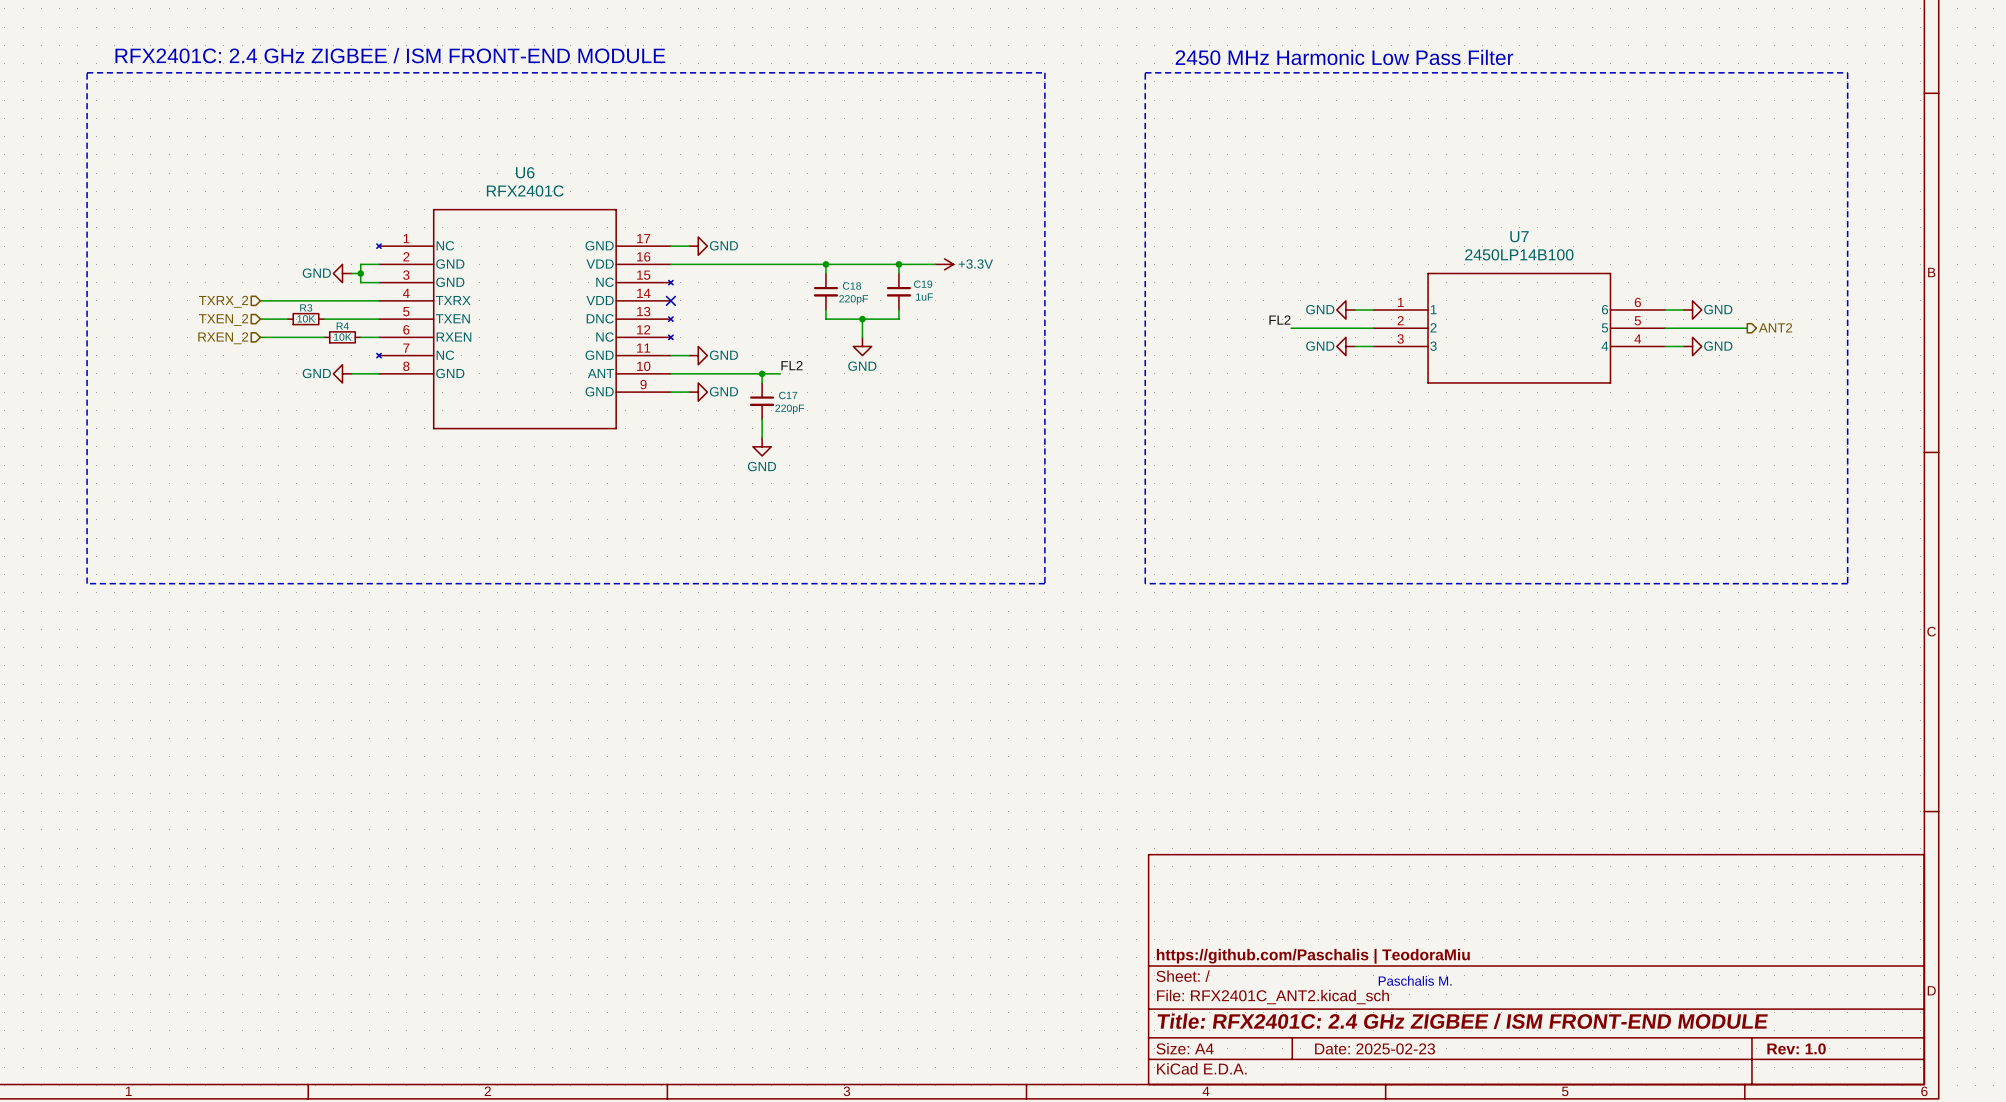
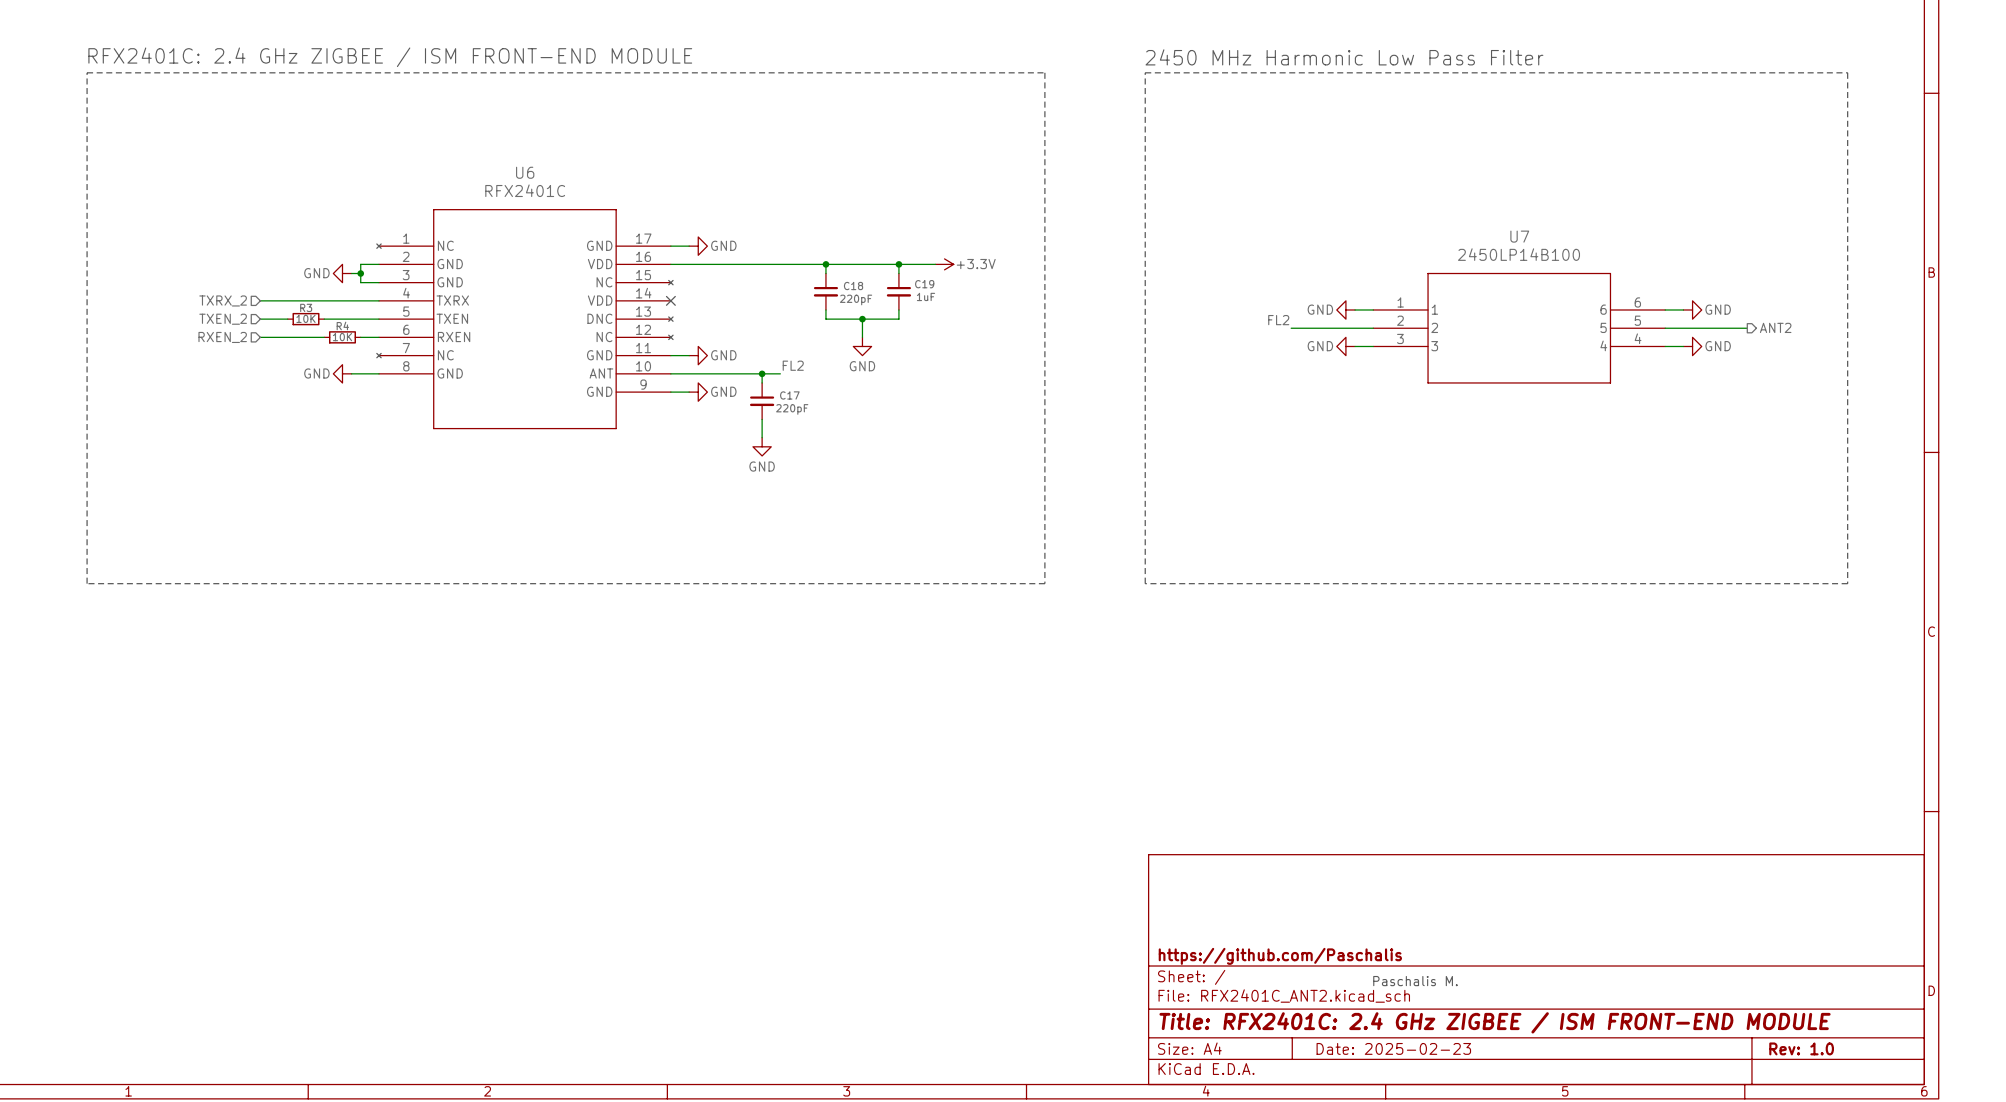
title block: https://github.com/Paschalis | TeodoraMiu (1313, 956) -> https://github.com/Paschalis (1280, 956)

